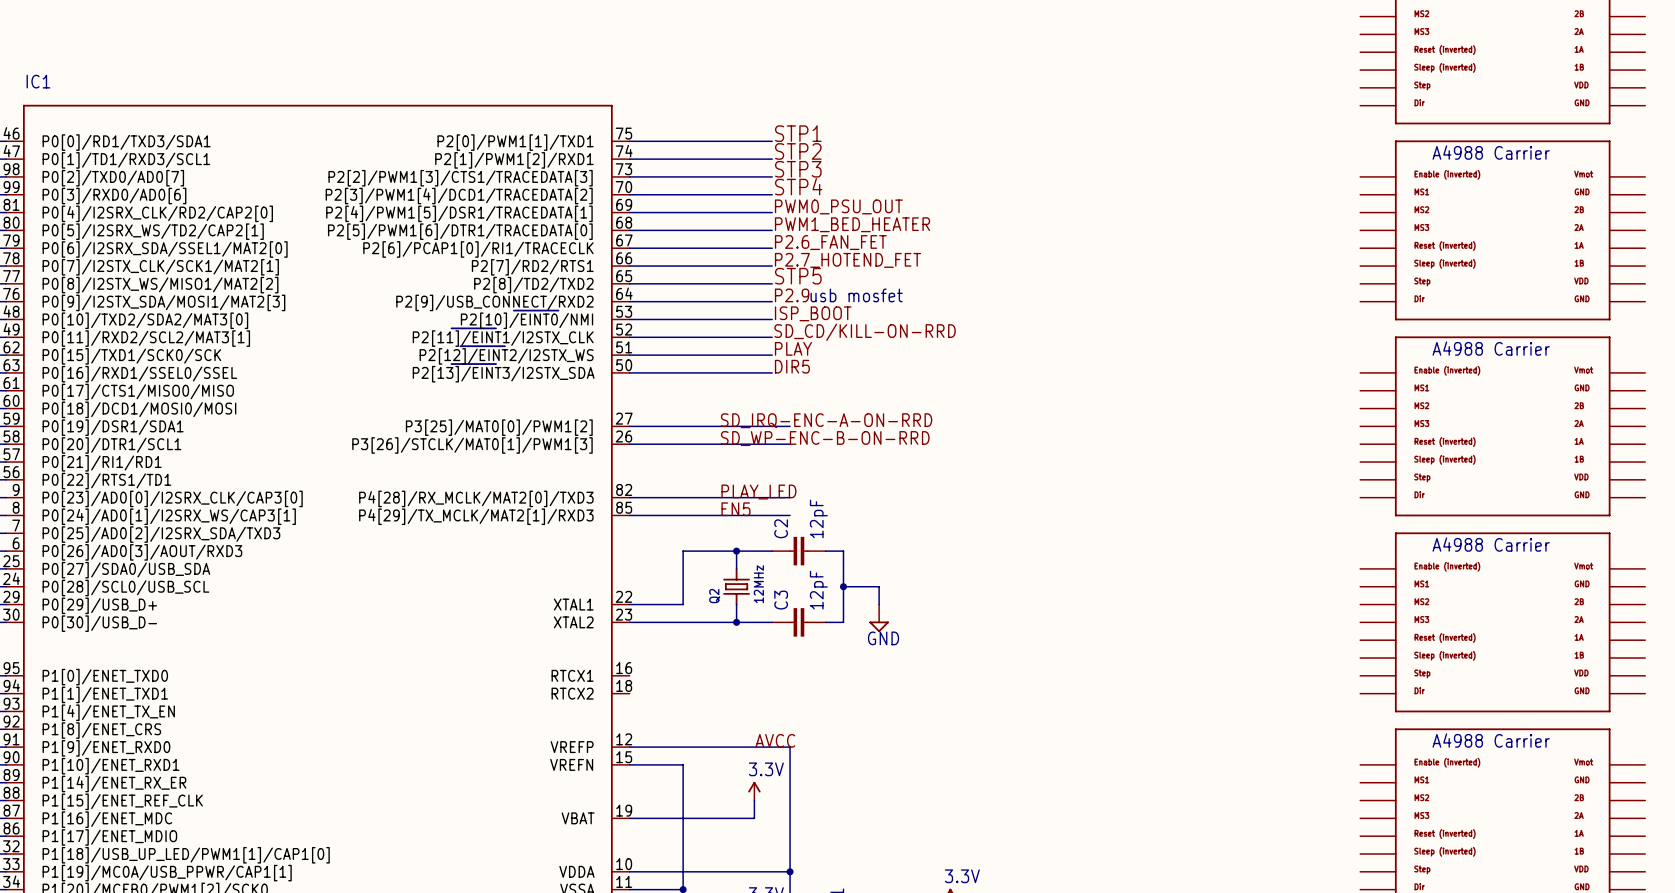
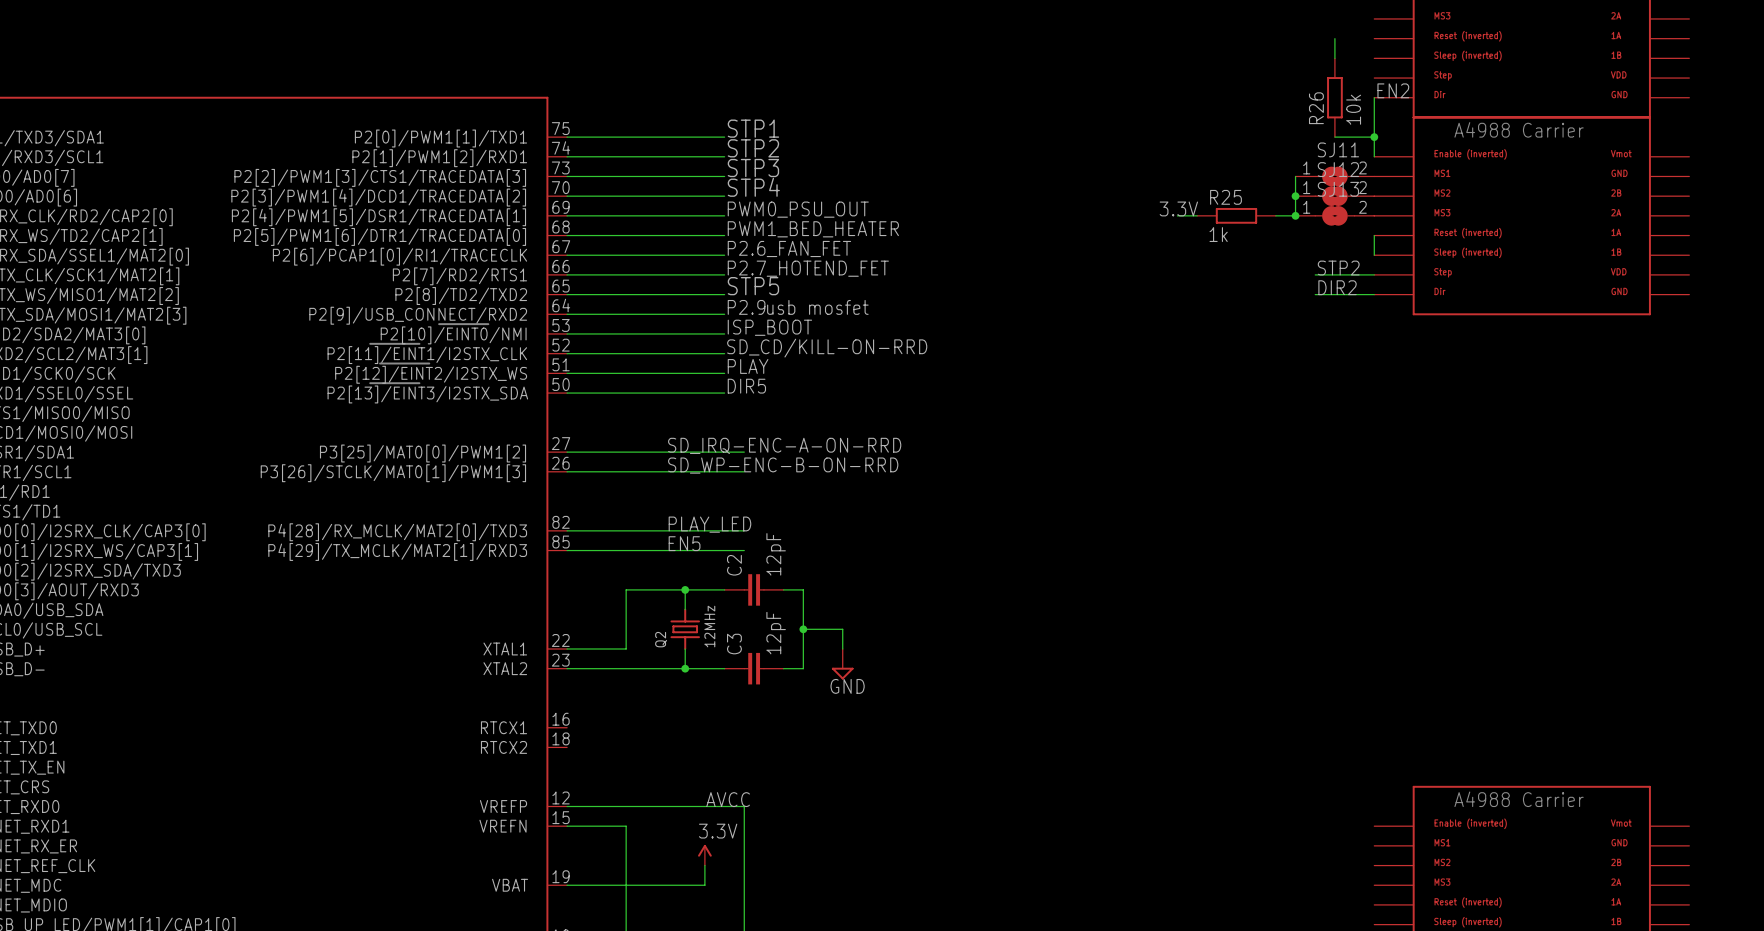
wire: none -> (1334, 38) (1334, 58)
label: none -> EN2 (1393, 90)
R26: none -> 10k (1334, 97)
wire: none -> (1374, 97) (1374, 156)
wire: none -> (1334, 137) (1374, 137)
junction: none -> (1374, 137)
wire: none -> (1295, 176) (1295, 215) (1275, 215)
SJ11: none -> (1334, 176)
junction: none -> (1295, 196)
SJ12: none -> (1334, 196)
label: none -> 3.3V (1178, 208)
wire: none -> (1177, 215) (1197, 215)
R25: none -> 1k (1236, 215)
junction: none -> (1295, 215)
SJ13: none -> (1334, 215)
wire: none -> (1374, 235) (1374, 255)
part position: (1502, 230) -> (1531, 215)
label: none -> STP2 (1338, 268)
wire: none -> (1315, 274) (1374, 274)
label: none -> DIR2 (1337, 287)
wire: none -> (1315, 294) (1374, 294)
part: (1502, 426) -> none
part: (1502, 622) -> none

